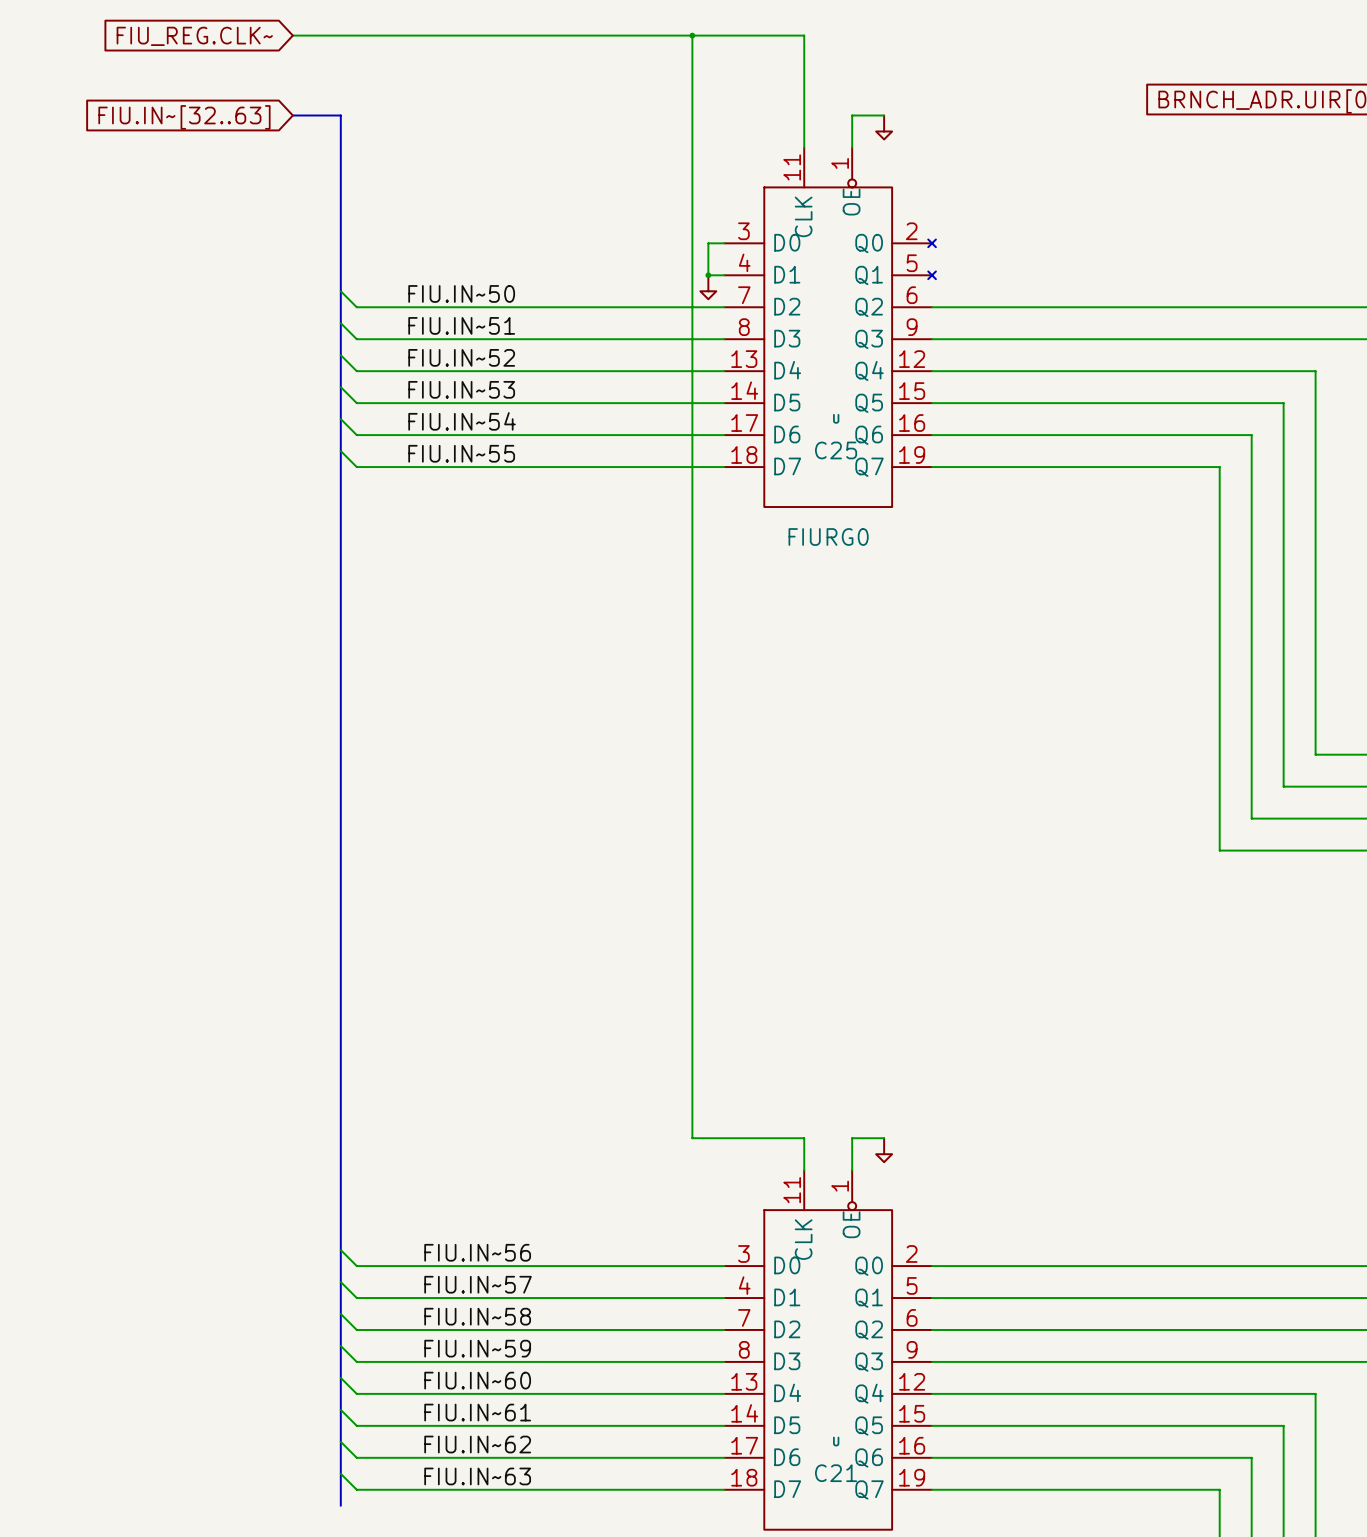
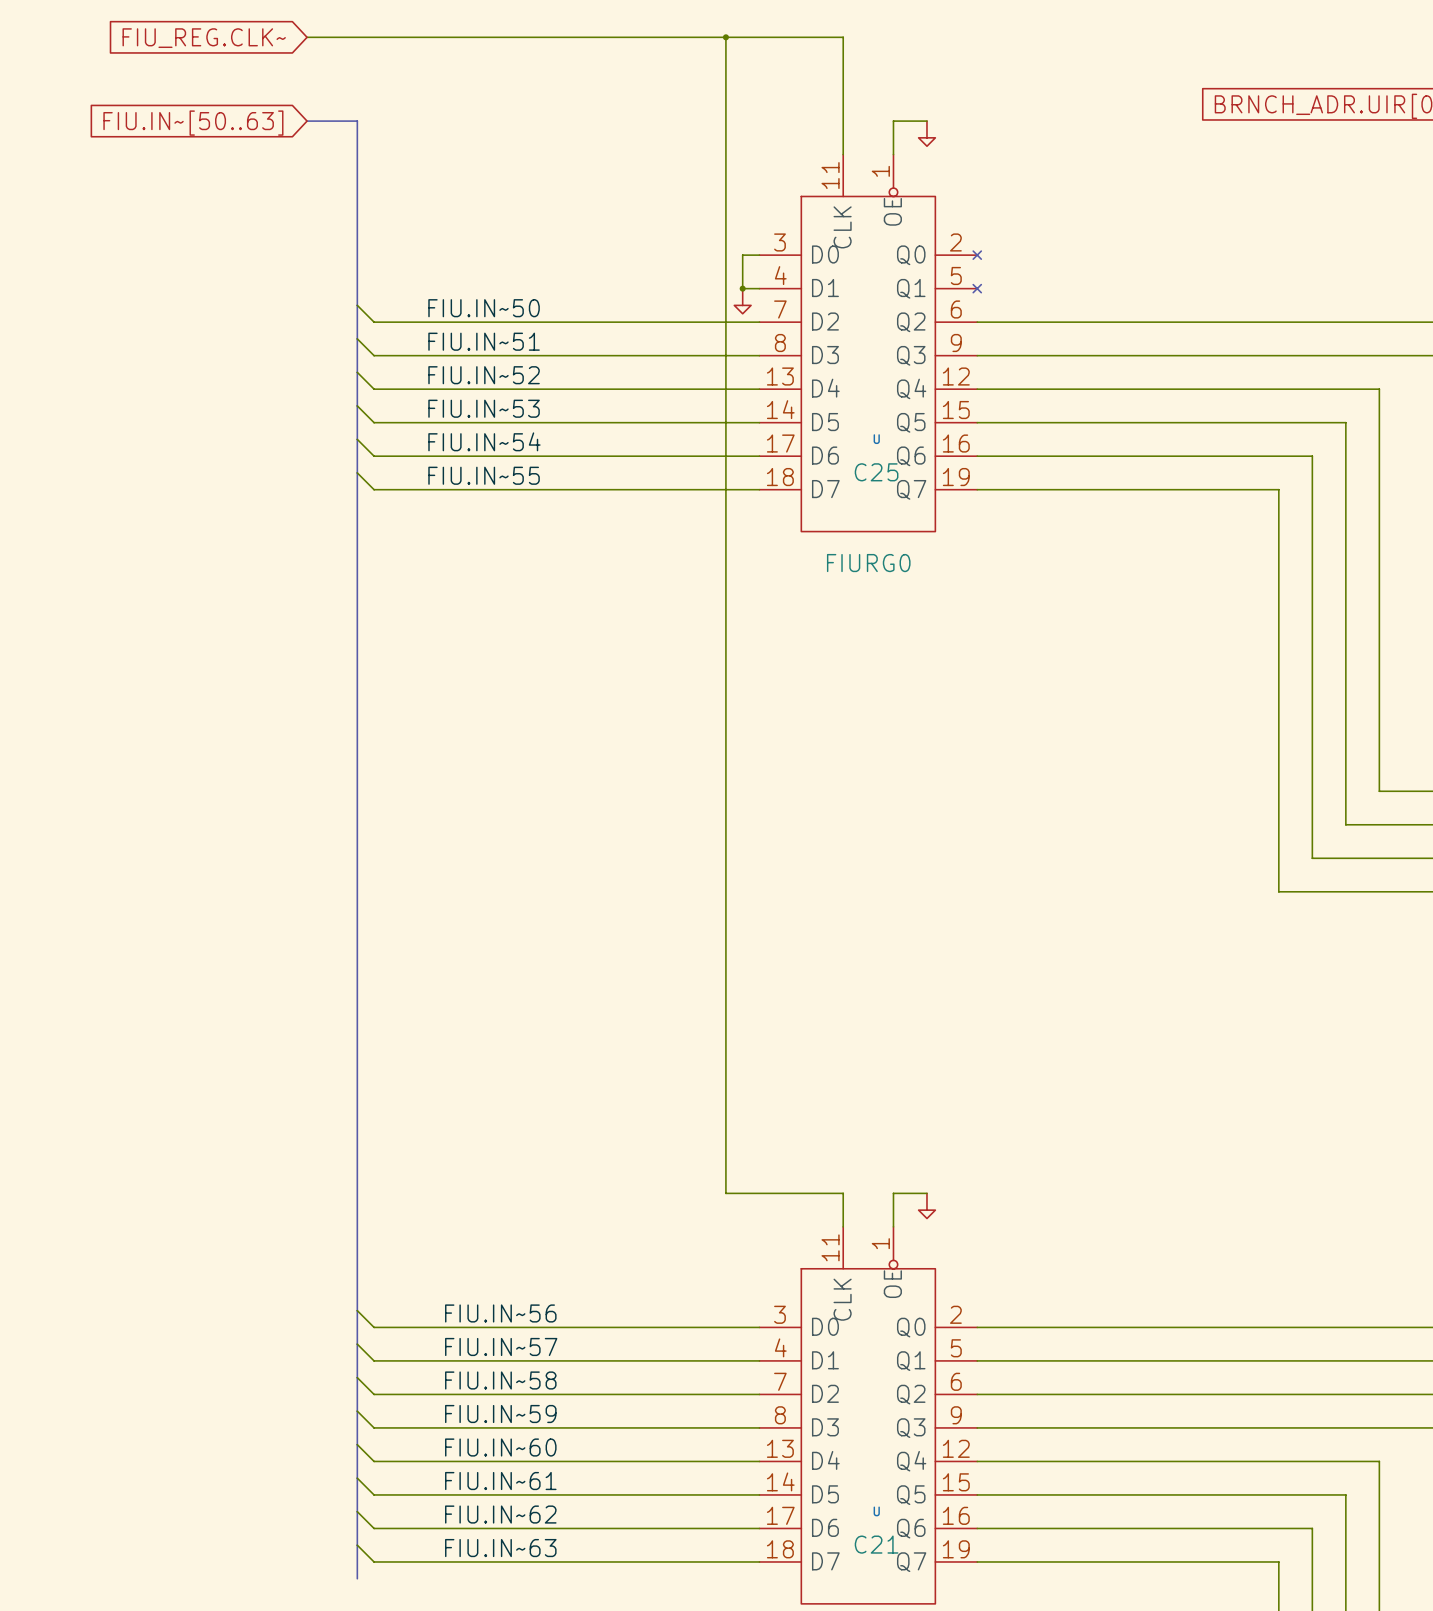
global label: FIU.IN~[32..63] (184, 117) -> FIU.IN~[50..63] (193, 123)

